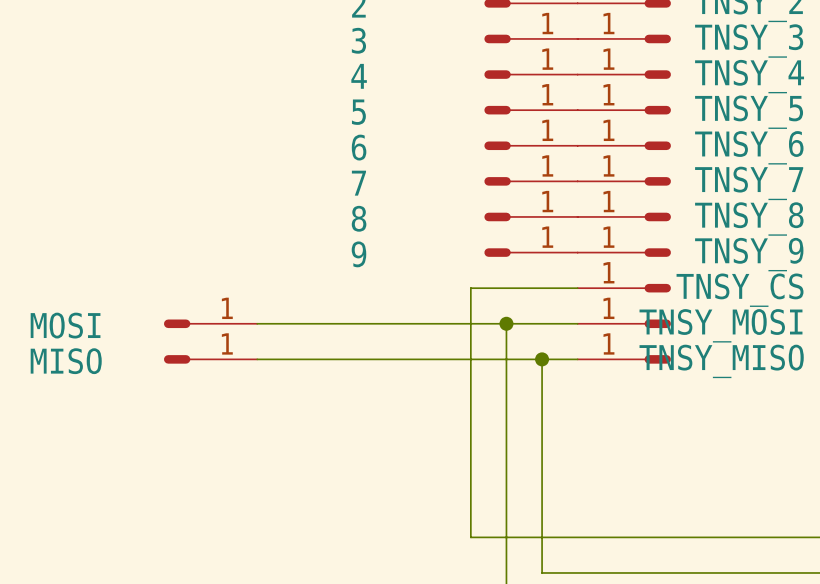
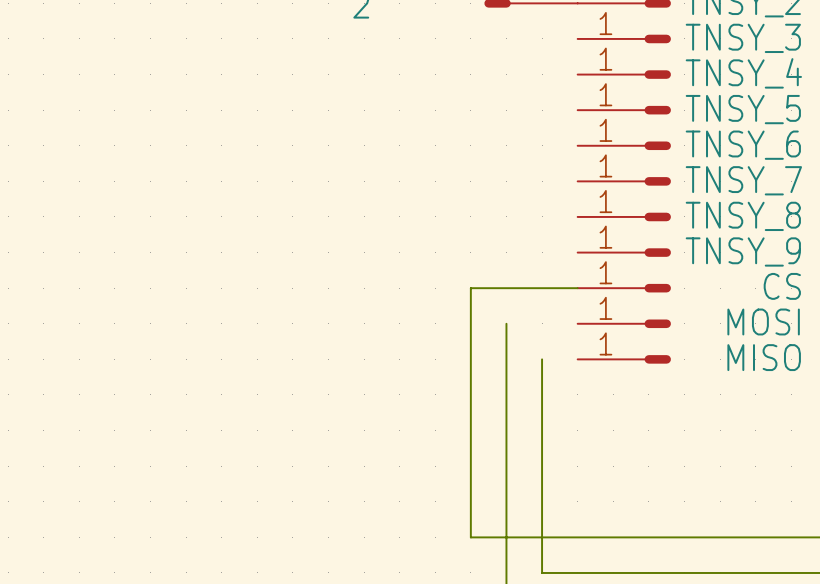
3: (531, 38) -> none
4: (531, 74) -> none
5: (531, 110) -> none
6: (531, 145) -> none
7: (531, 181) -> none
8: (531, 216) -> none
9: (531, 252) -> none
TNSY_CS name: TNSY_CS (740, 290) -> CS (782, 286)
MOSI: (210, 323) -> none
wire: (257, 323) (577, 323) -> none
junction: (506, 323) -> none
TNSY_MOSI name: TNSY_MOSI (720, 325) -> MOSI (763, 322)
MISO: (210, 359) -> none
wire: (257, 359) (577, 359) -> none
junction: (542, 359) -> none
TNSY_MISO name: TNSY_MISO (721, 361) -> MISO (764, 357)

